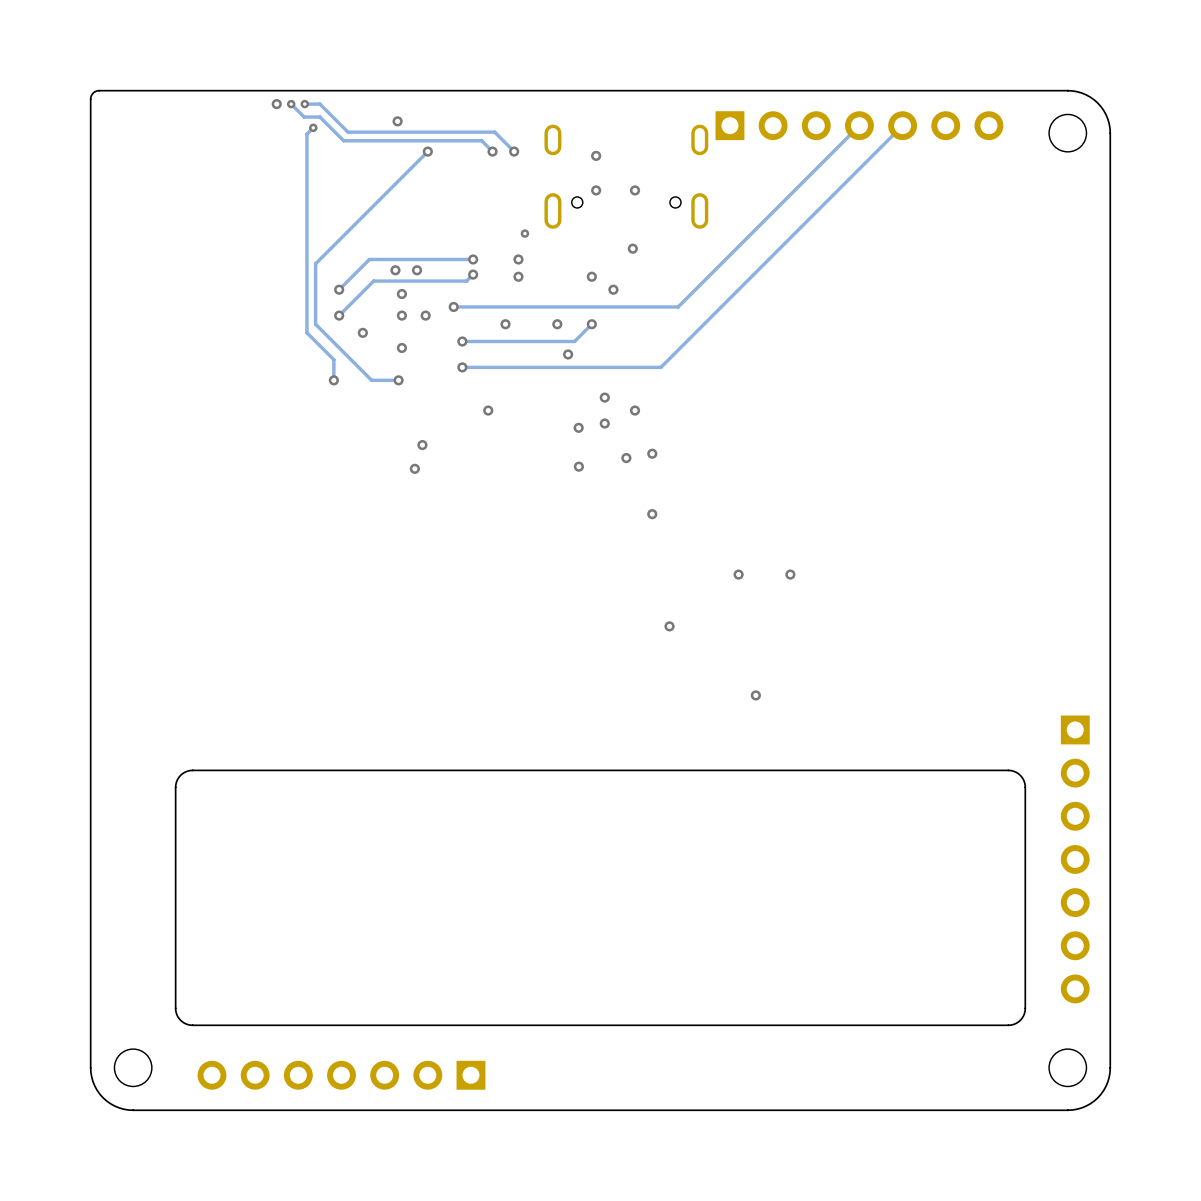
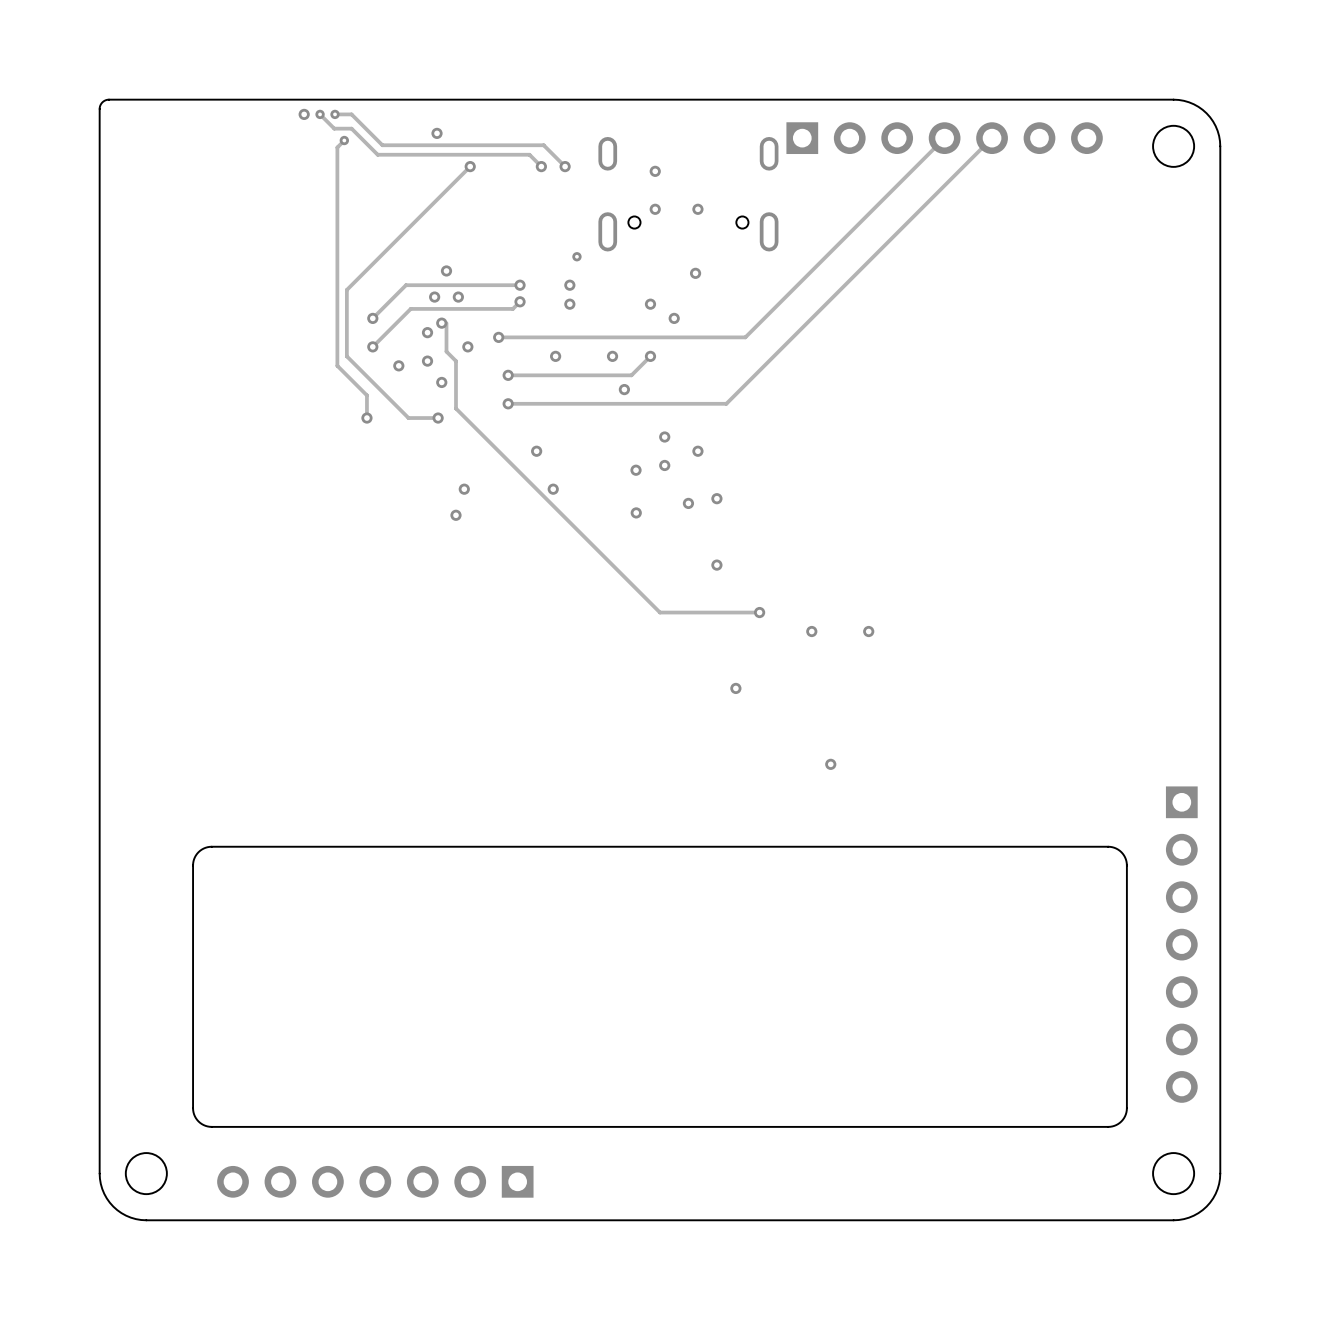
via: none -> (446, 270)
track: none -> (446, 323) (446, 351) (455, 361) (455, 408) (659, 612) (759, 612)
via: none -> (427, 332)
via: (401, 315) -> none
via: none -> (427, 361)
via: none -> (553, 489)
via: none -> (759, 612)

